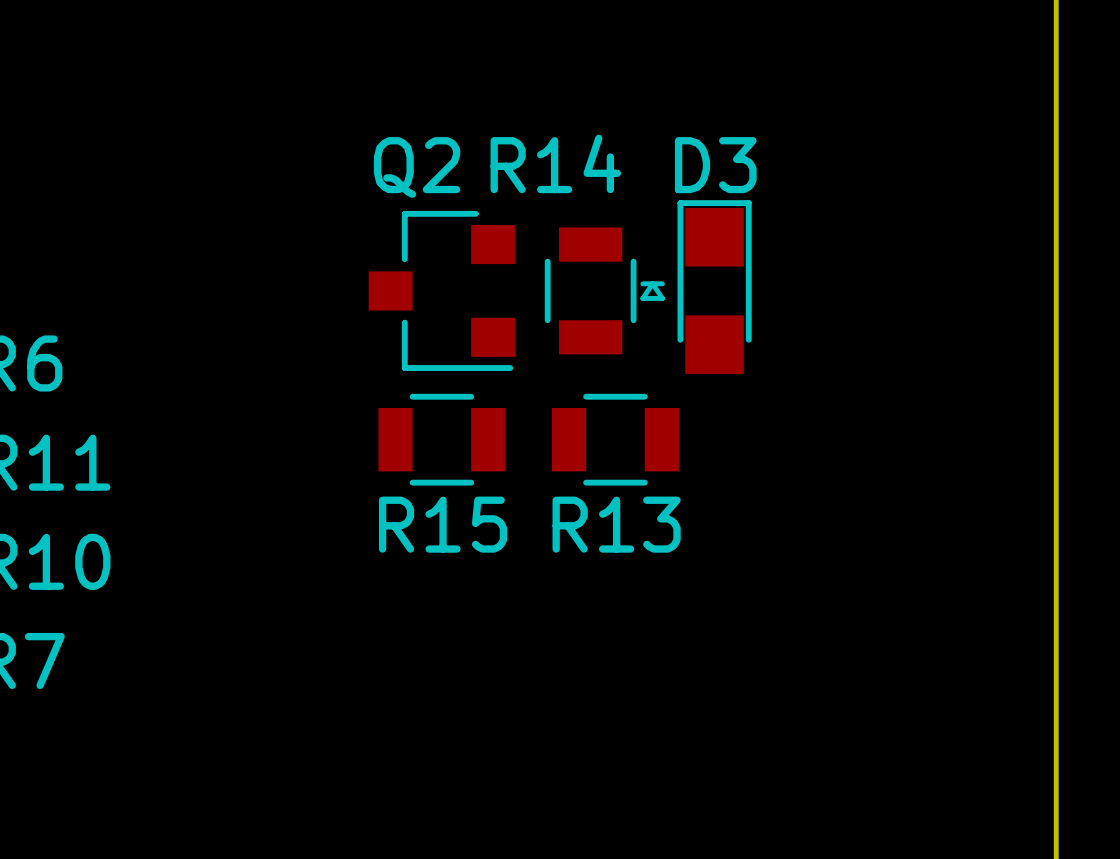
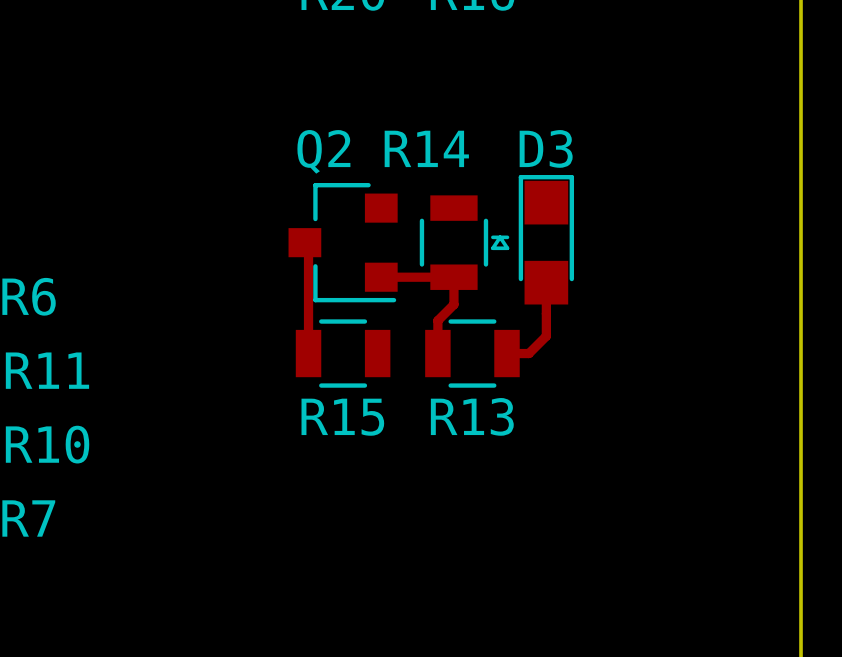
track: none -> (304, 242) (308, 246) (308, 353)
track: none -> (381, 277) (453, 277) (453, 304) (437, 320) (437, 353)
track: none -> (546, 282) (546, 336) (528, 353) (507, 353)

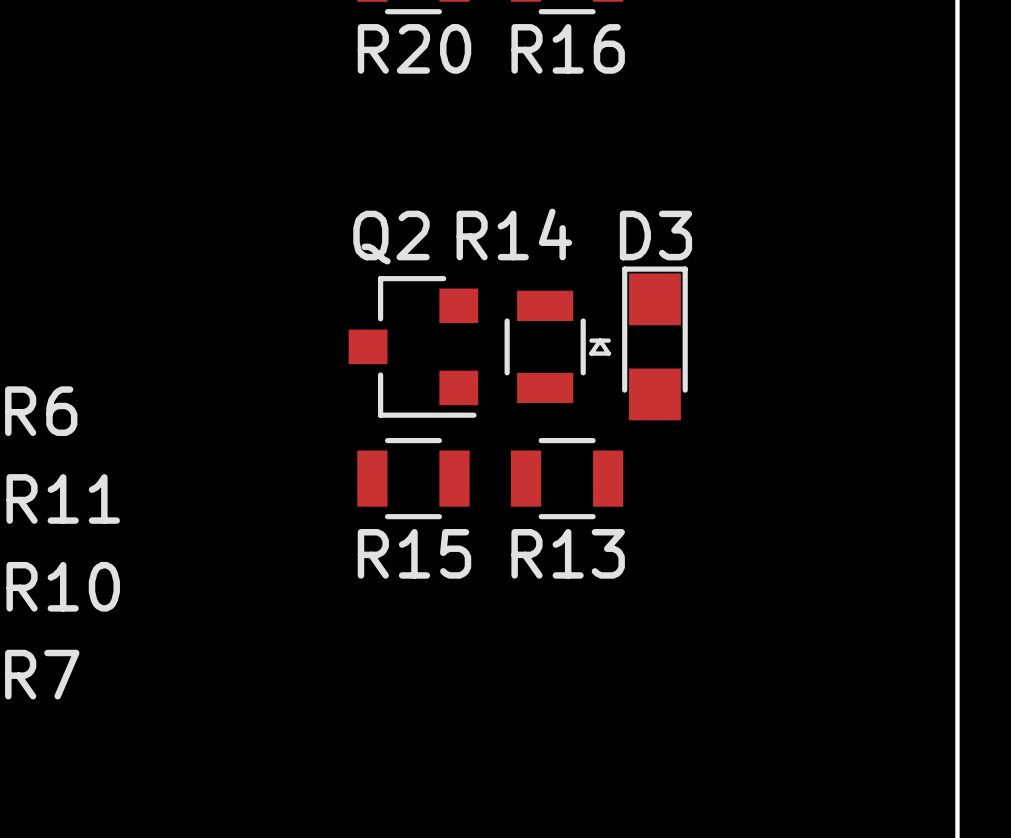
track: (304, 242) (308, 246) (308, 353) -> none
track: (381, 277) (453, 277) (453, 304) (437, 320) (437, 353) -> none
track: (546, 282) (546, 336) (528, 353) (507, 353) -> none

